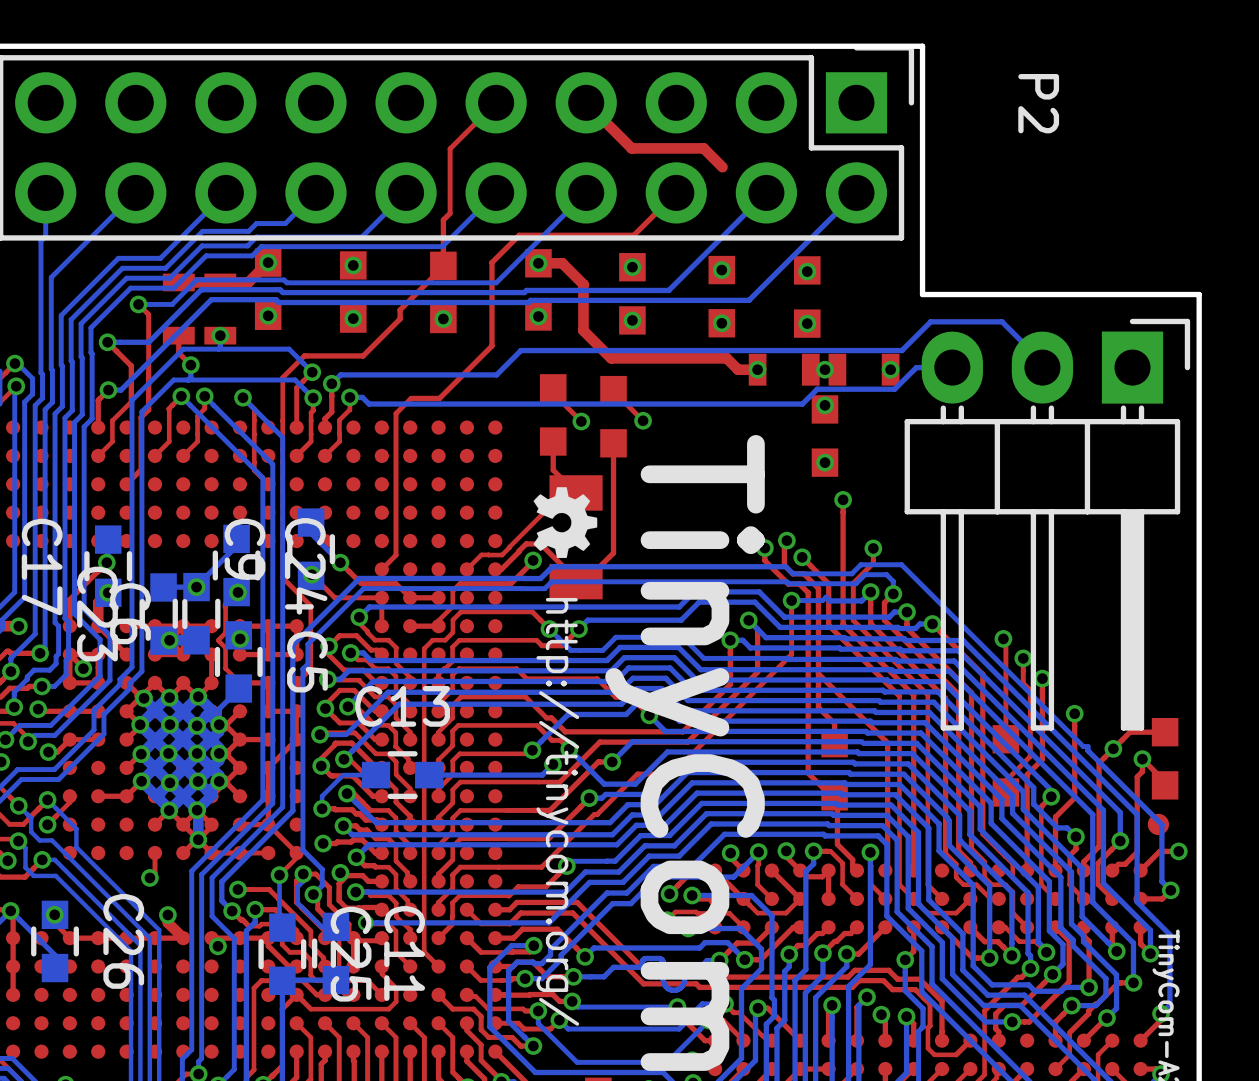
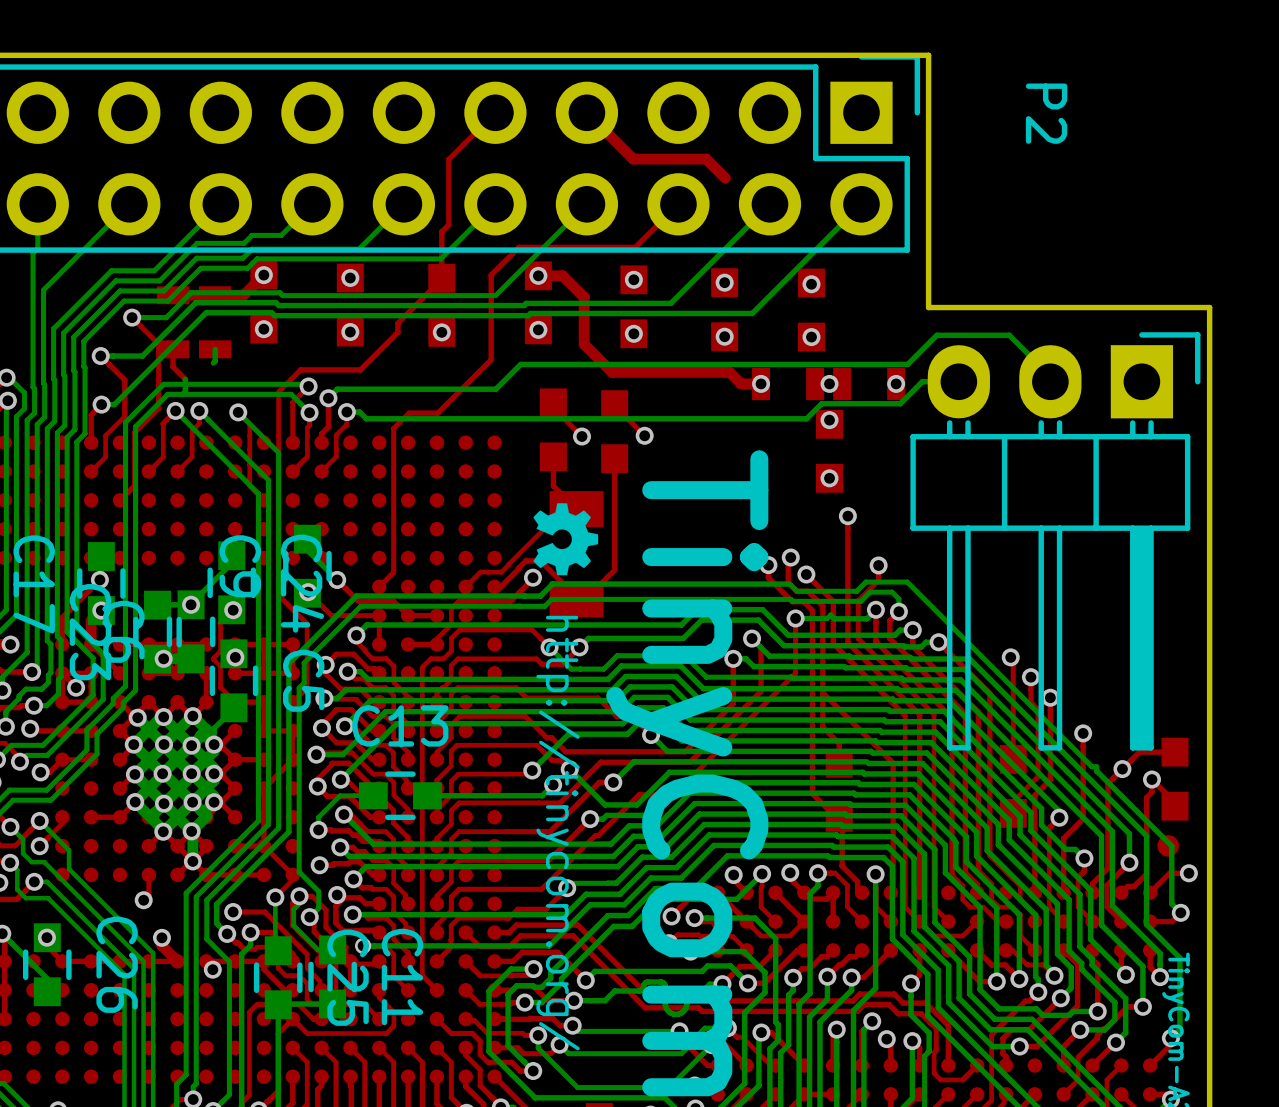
top track: (148, 314) (148, 409) -> (142, 327) (158, 344) (158, 408) (142, 424)
via: (220, 335) -> none
via: (190, 365) -> none
bottom track: (310, 370) (289, 349) (183, 349) (131, 400) (131, 407) -> (306, 384) (163, 384) (125, 422)

